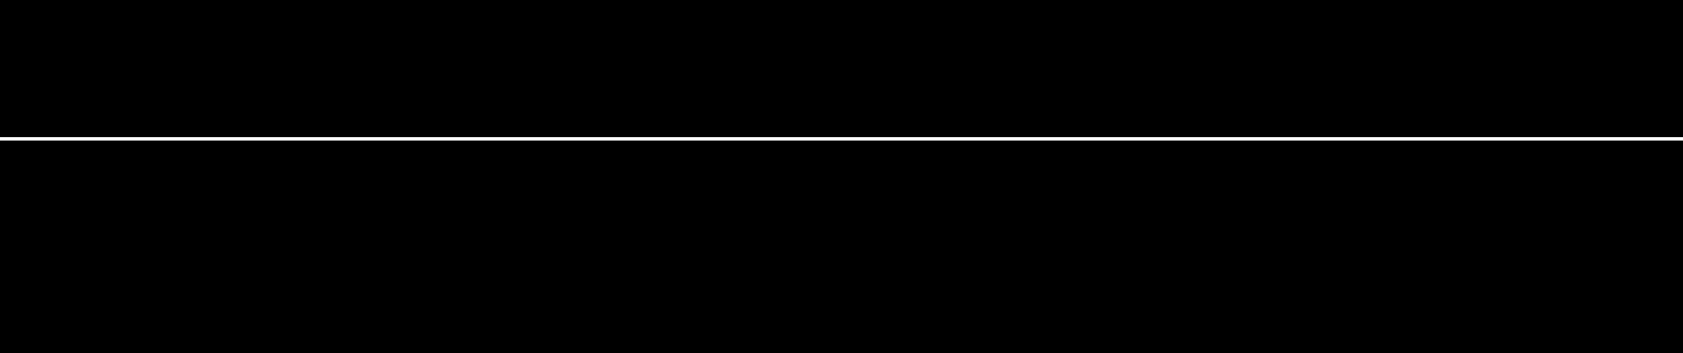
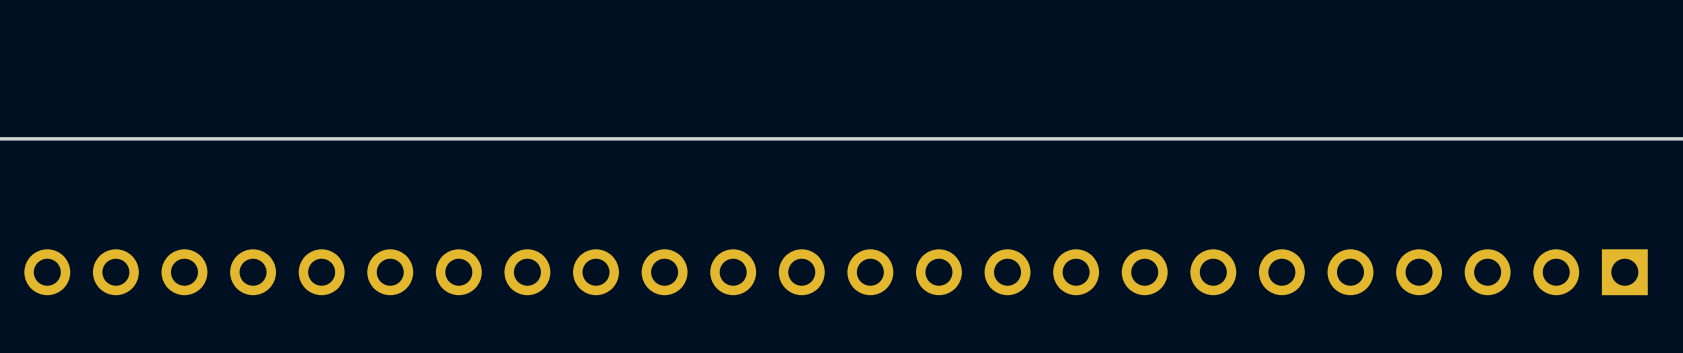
part: none -> (836, 272)

